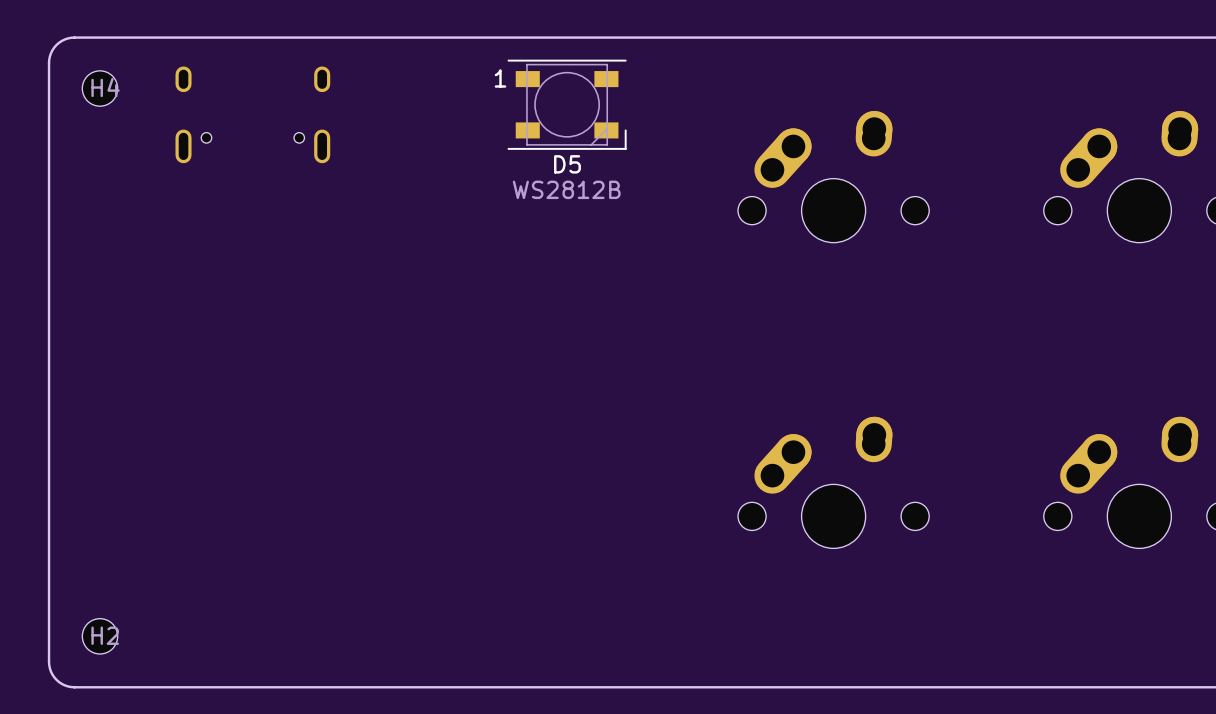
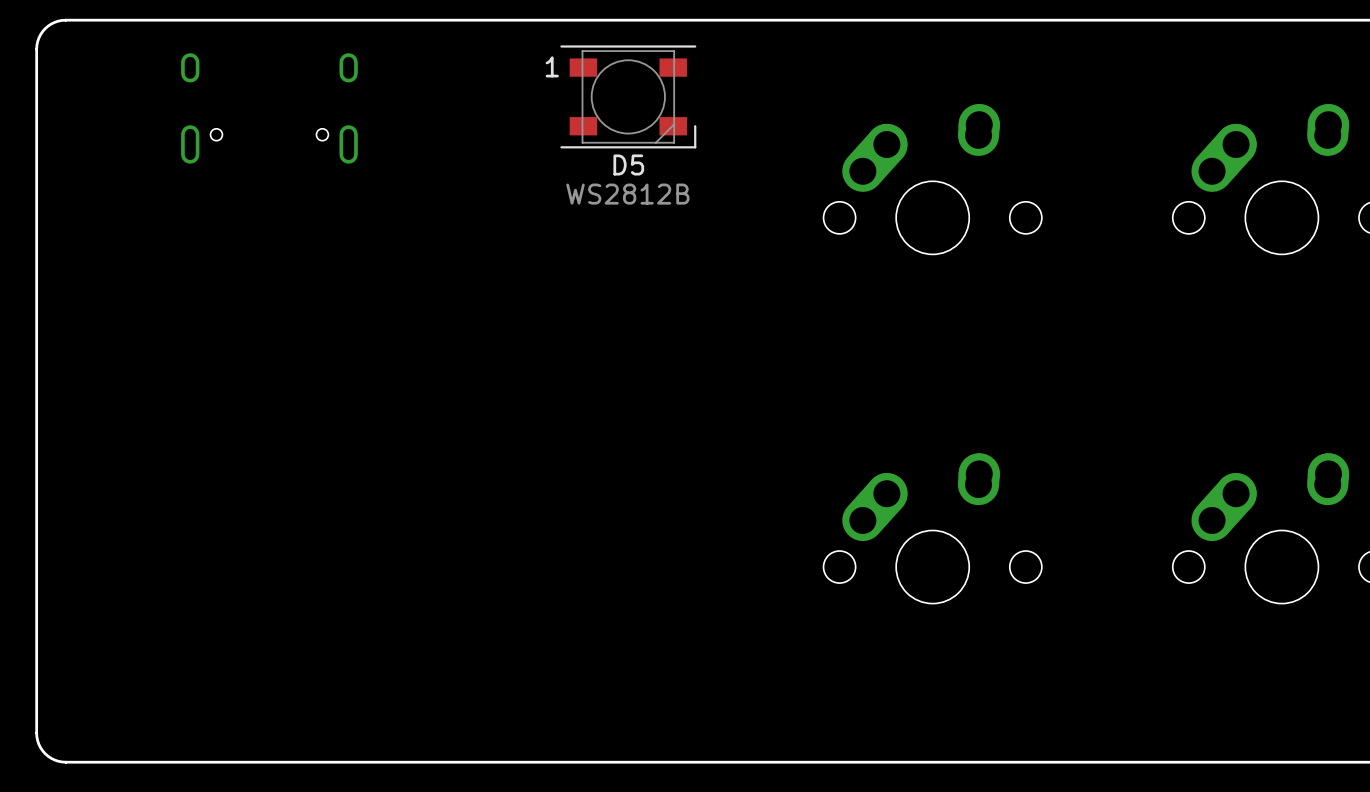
H4: (99, 88) -> none
H2: (99, 636) -> none

